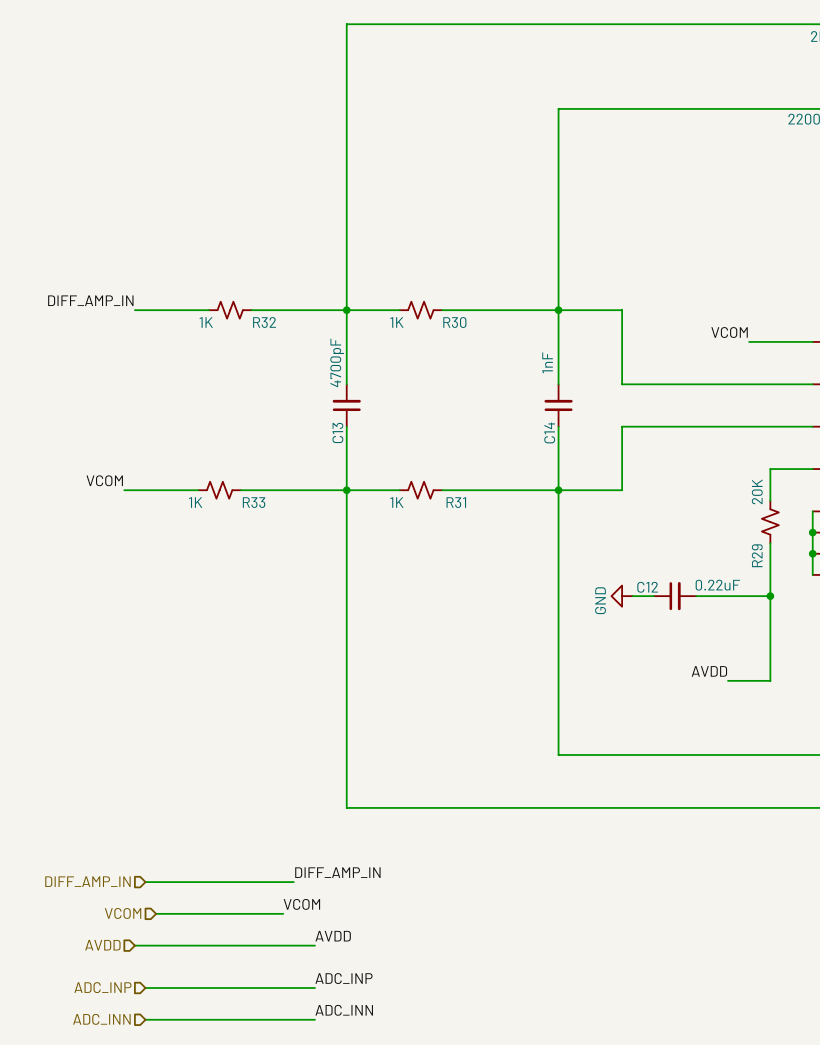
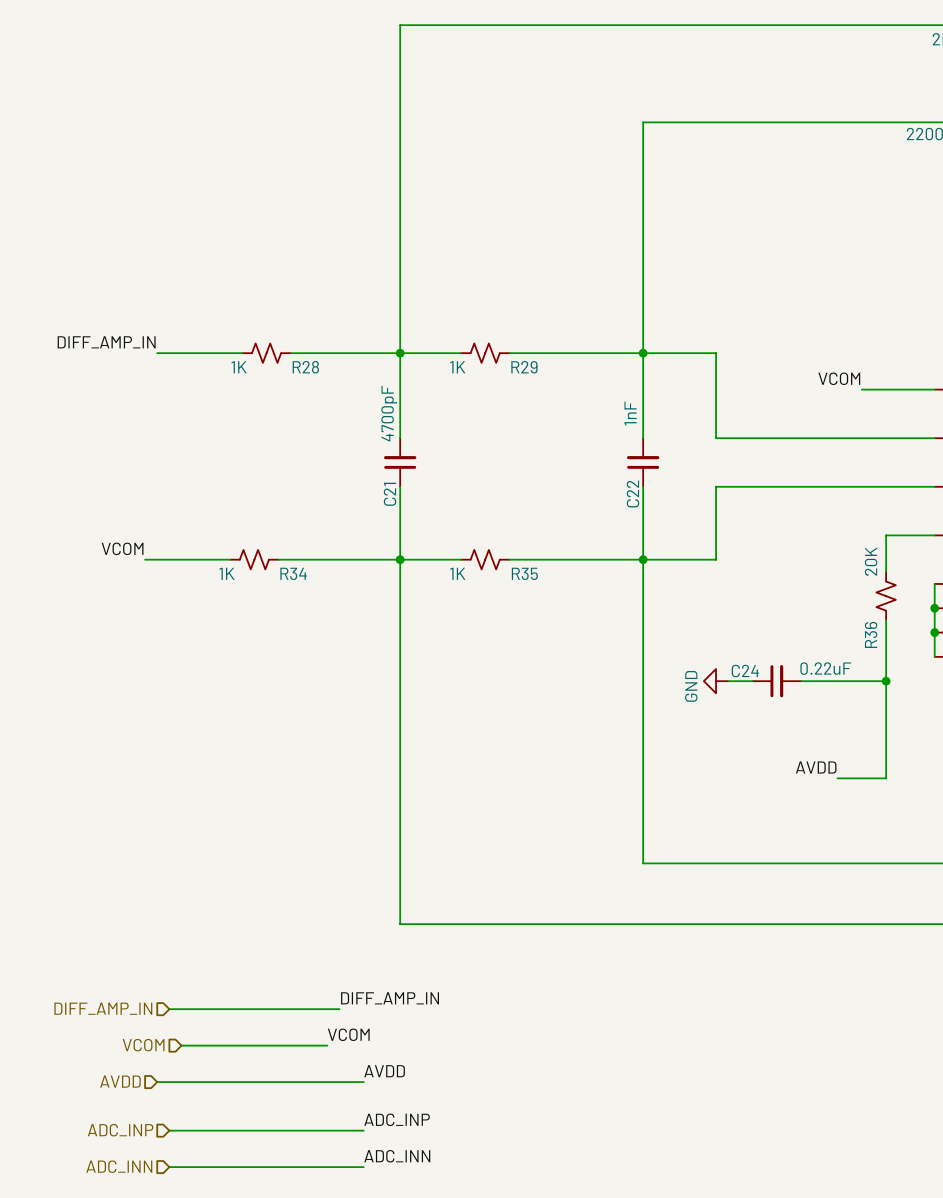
R32 name: R32 (264, 322) -> R28 (305, 367)
R30 name: R30 (454, 322) -> R29 (524, 367)
C13 name: C13 (337, 432) -> C21 (390, 494)
C14 name: C14 (549, 432) -> C22 (632, 493)
R33 name: R33 (254, 502) -> R34 (293, 573)
R31 name: R31 (456, 502) -> R35 (524, 573)
R29 name: R29 (757, 555) -> R36 (871, 634)
C12 name: C12 (647, 587) -> C24 (745, 671)

